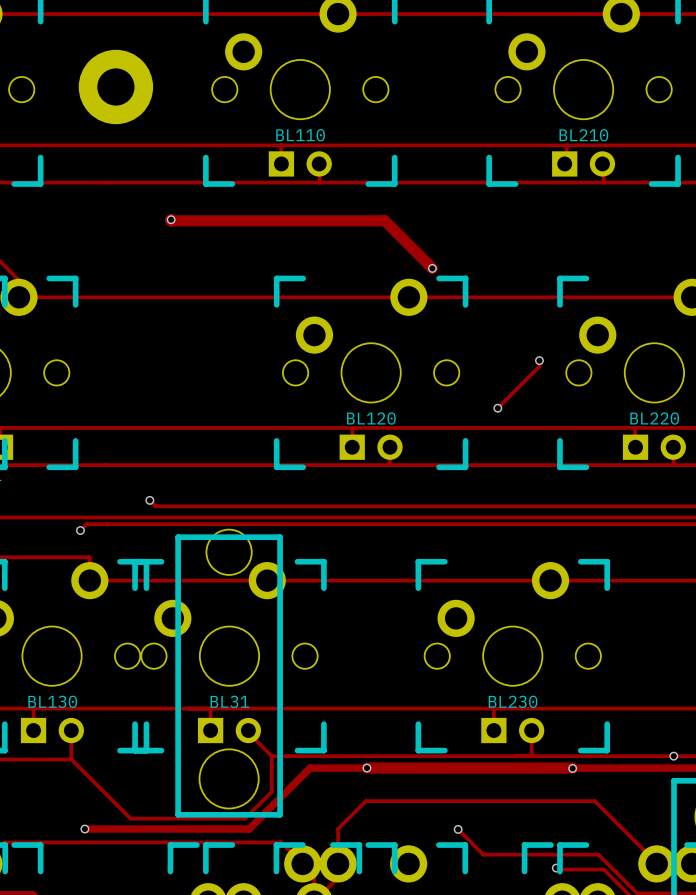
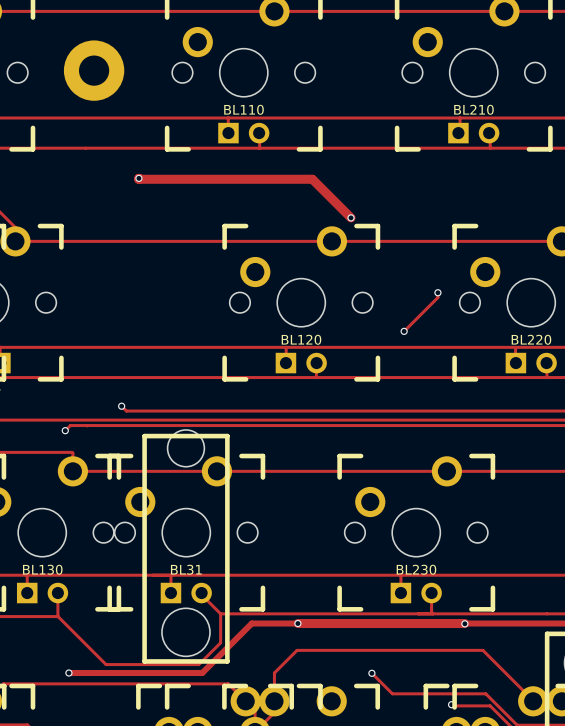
via: (673, 756) -> none

